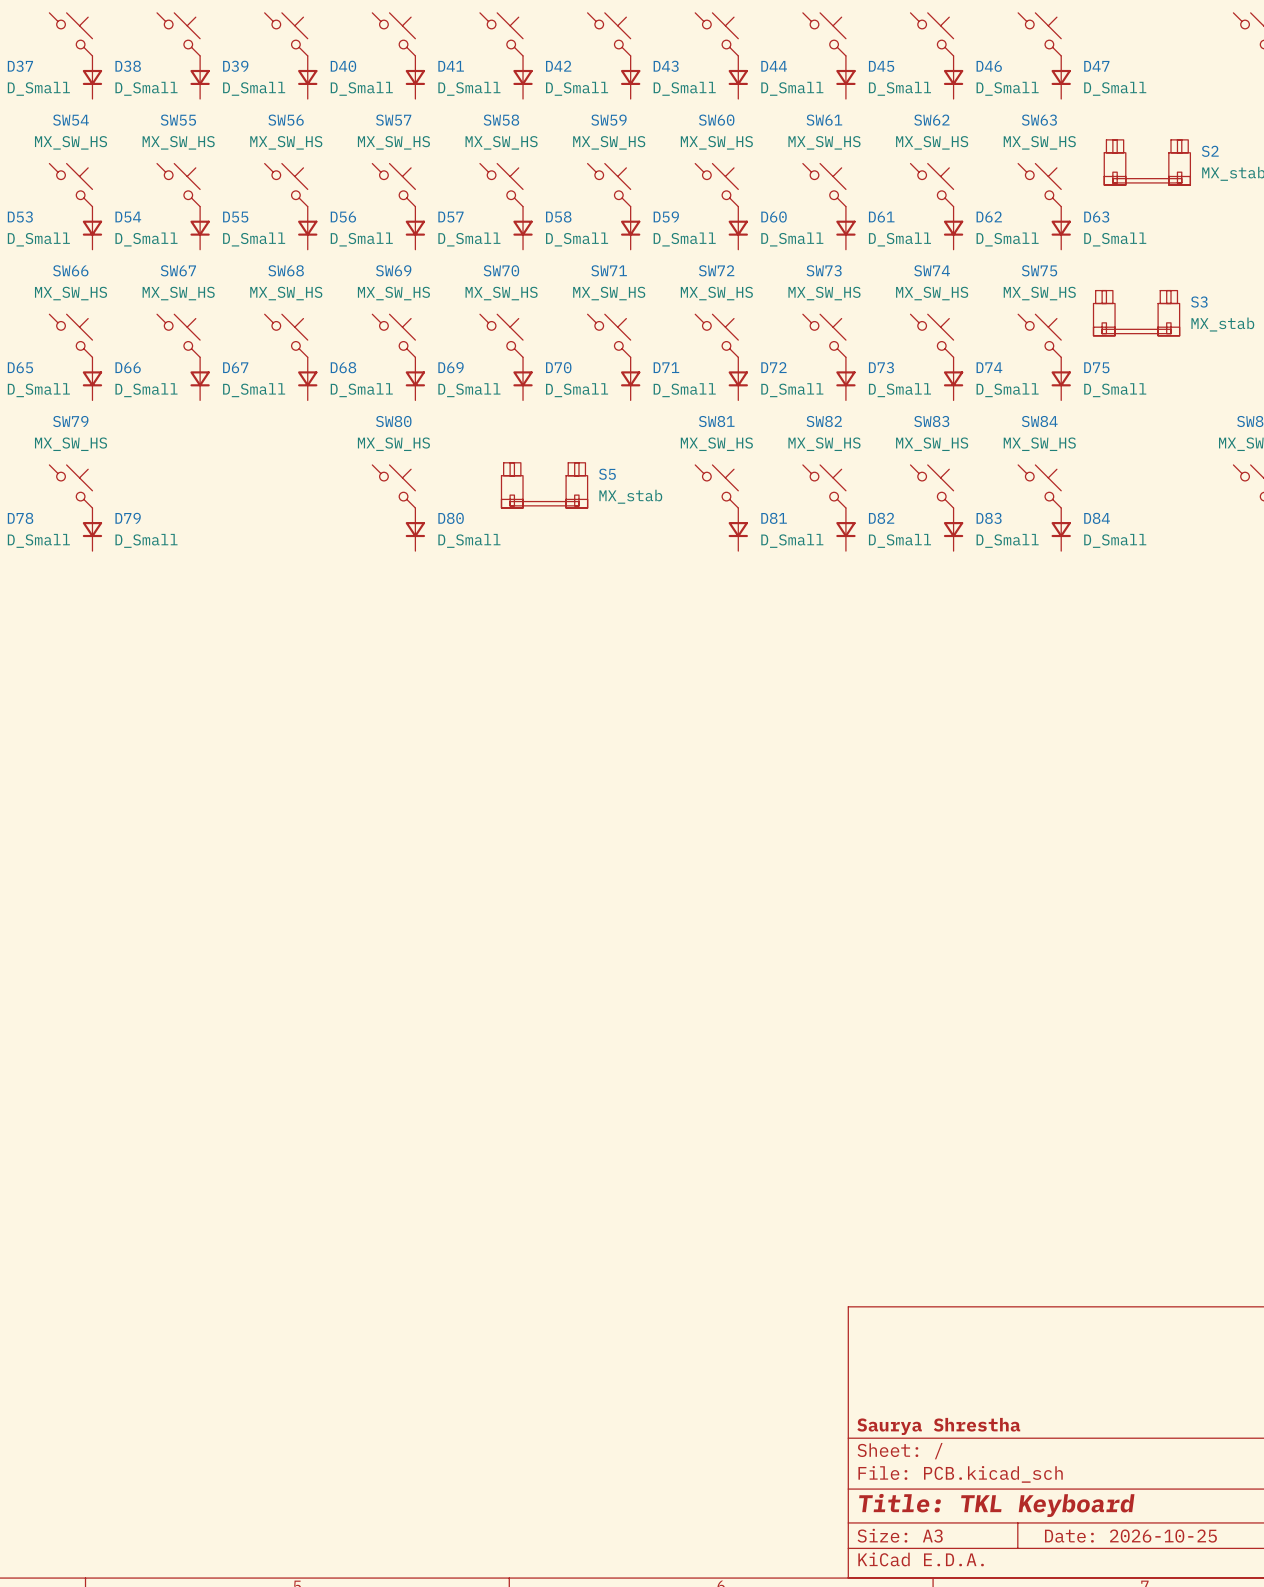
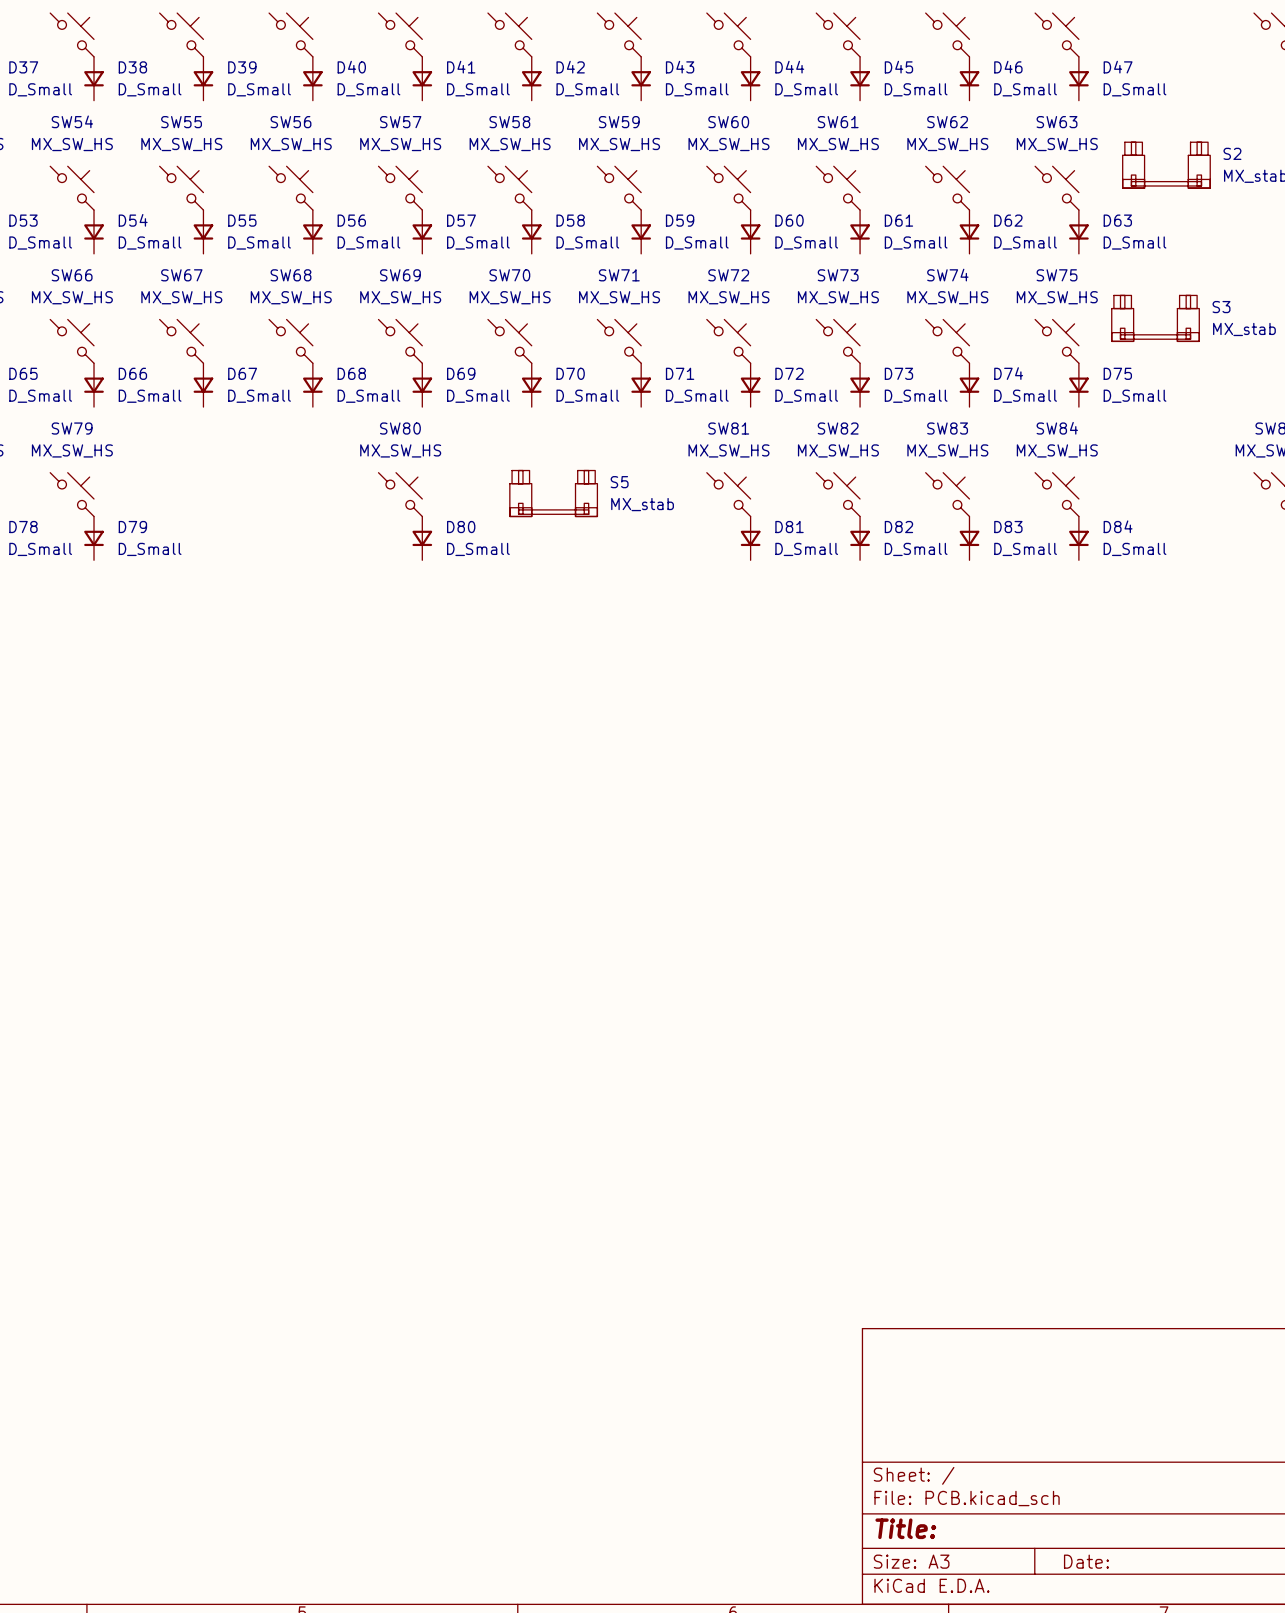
title block: Saurya Shrestha (938, 1426) -> none
title block: Title: TKL Keyboard (996, 1505) -> Title: (905, 1528)
title block: Date: 2026-10-25 (1130, 1536) -> Date: (1086, 1561)

